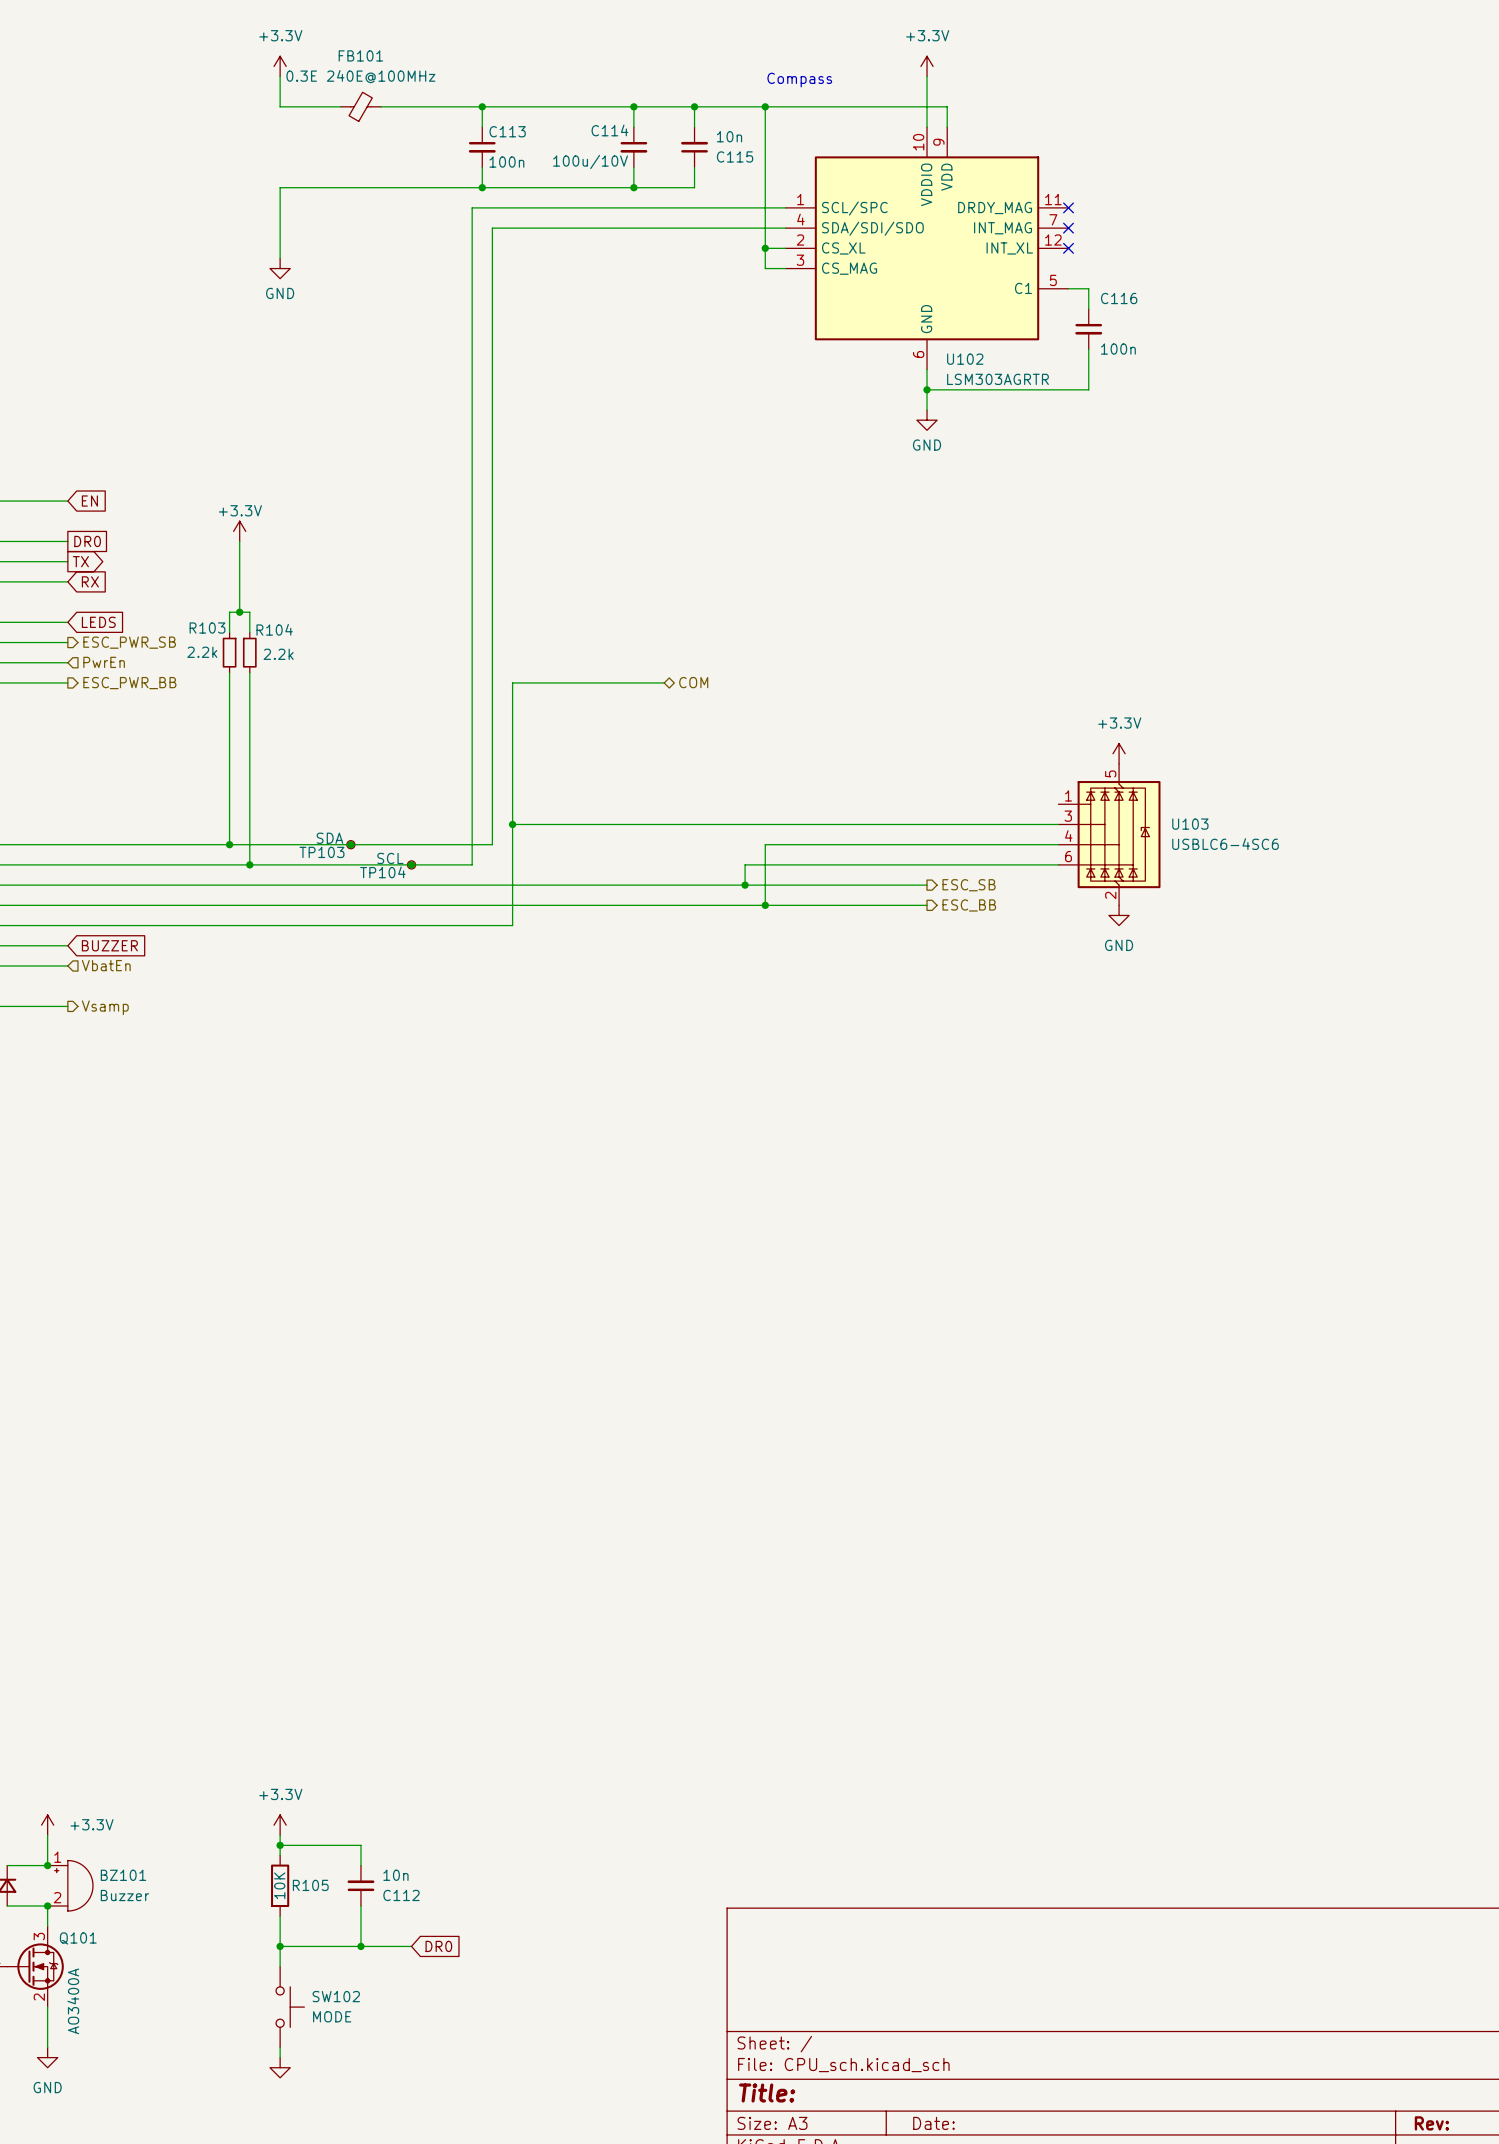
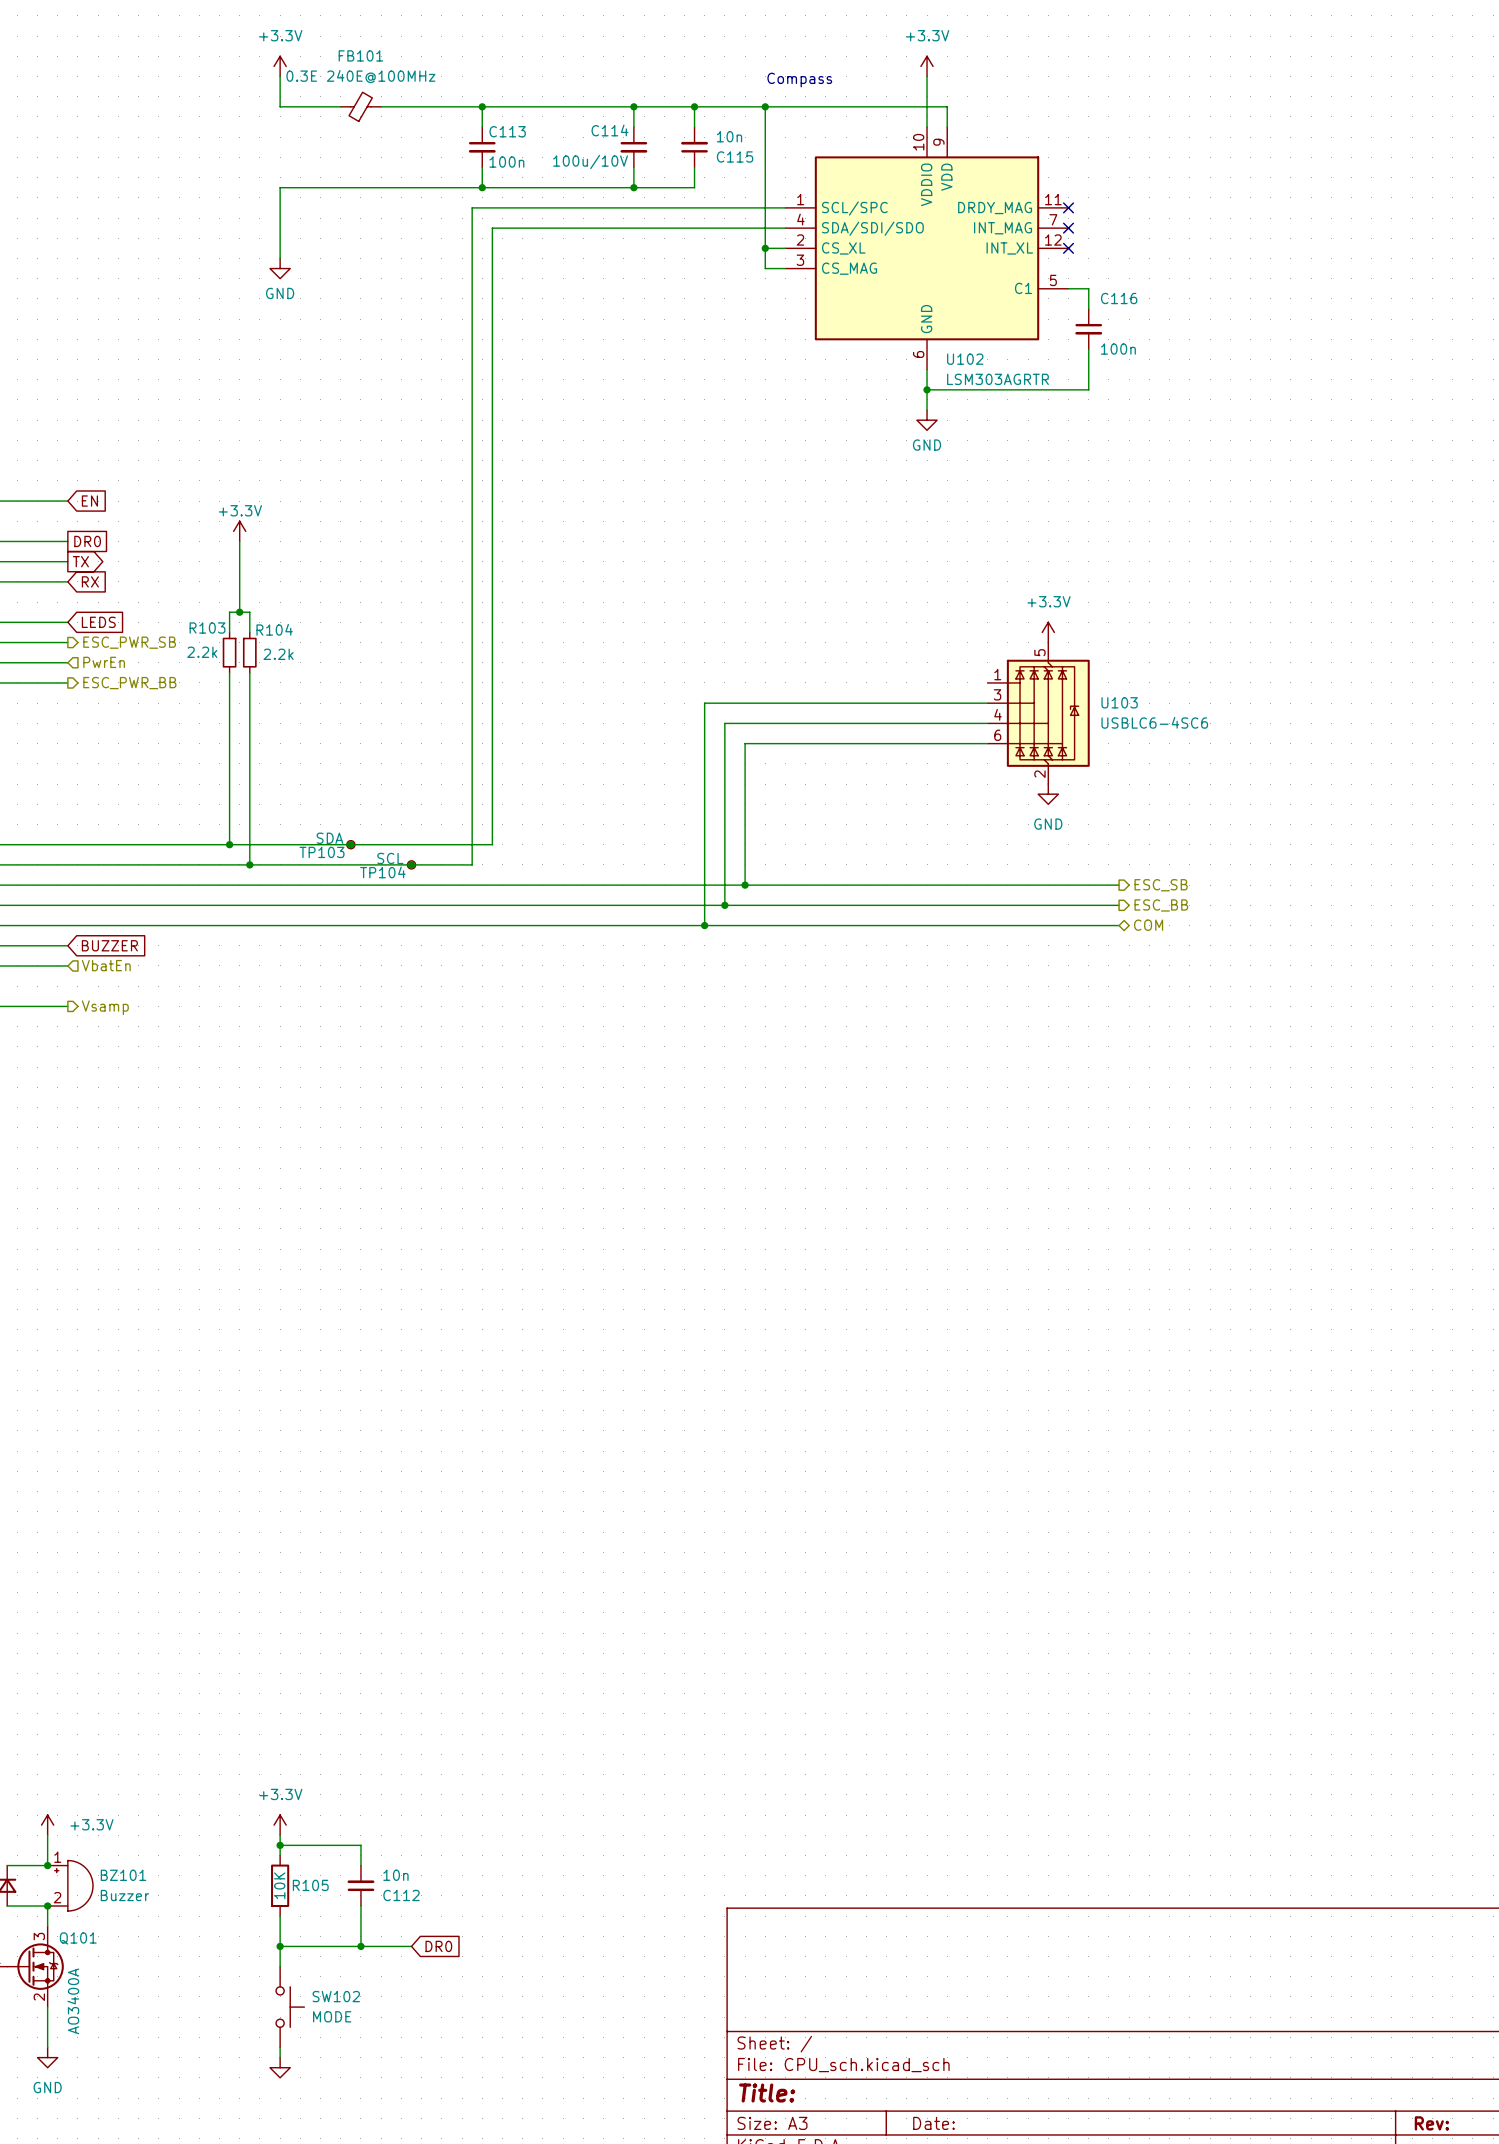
wire: (664, 682) (512, 682) (512, 925) -> (1119, 925) (512, 925)
hierarchical label: COM (693, 682) -> none
wire: none -> (987, 703) (704, 703) (704, 925)
wire: none -> (987, 723) (724, 723) (724, 905)
power symbol position: +3.3V (1119, 753) -> +3.3V (1048, 632)
wire: (512, 824) (1058, 824) -> none
junction: (512, 824) -> none
U103 position: (1109, 834) -> (1038, 713)
wire: (1058, 844) (765, 844) (765, 905) -> none
wire: (745, 864) (1058, 864) -> (745, 864) (745, 743) (987, 743)
wire: none -> (927, 885) (1119, 885)
hierarchical label position: ESC_SB (969, 885) -> ESC_SB (1161, 885)
junction: none -> (724, 905)
junction: (765, 905) -> none
wire: none -> (927, 905) (1119, 905)
hierarchical label position: ESC_BB (969, 905) -> ESC_BB (1161, 905)
power symbol position: GND (1119, 915) -> GND (1048, 794)
junction: none -> (704, 925)
hierarchical label: none -> COM (1148, 925)

